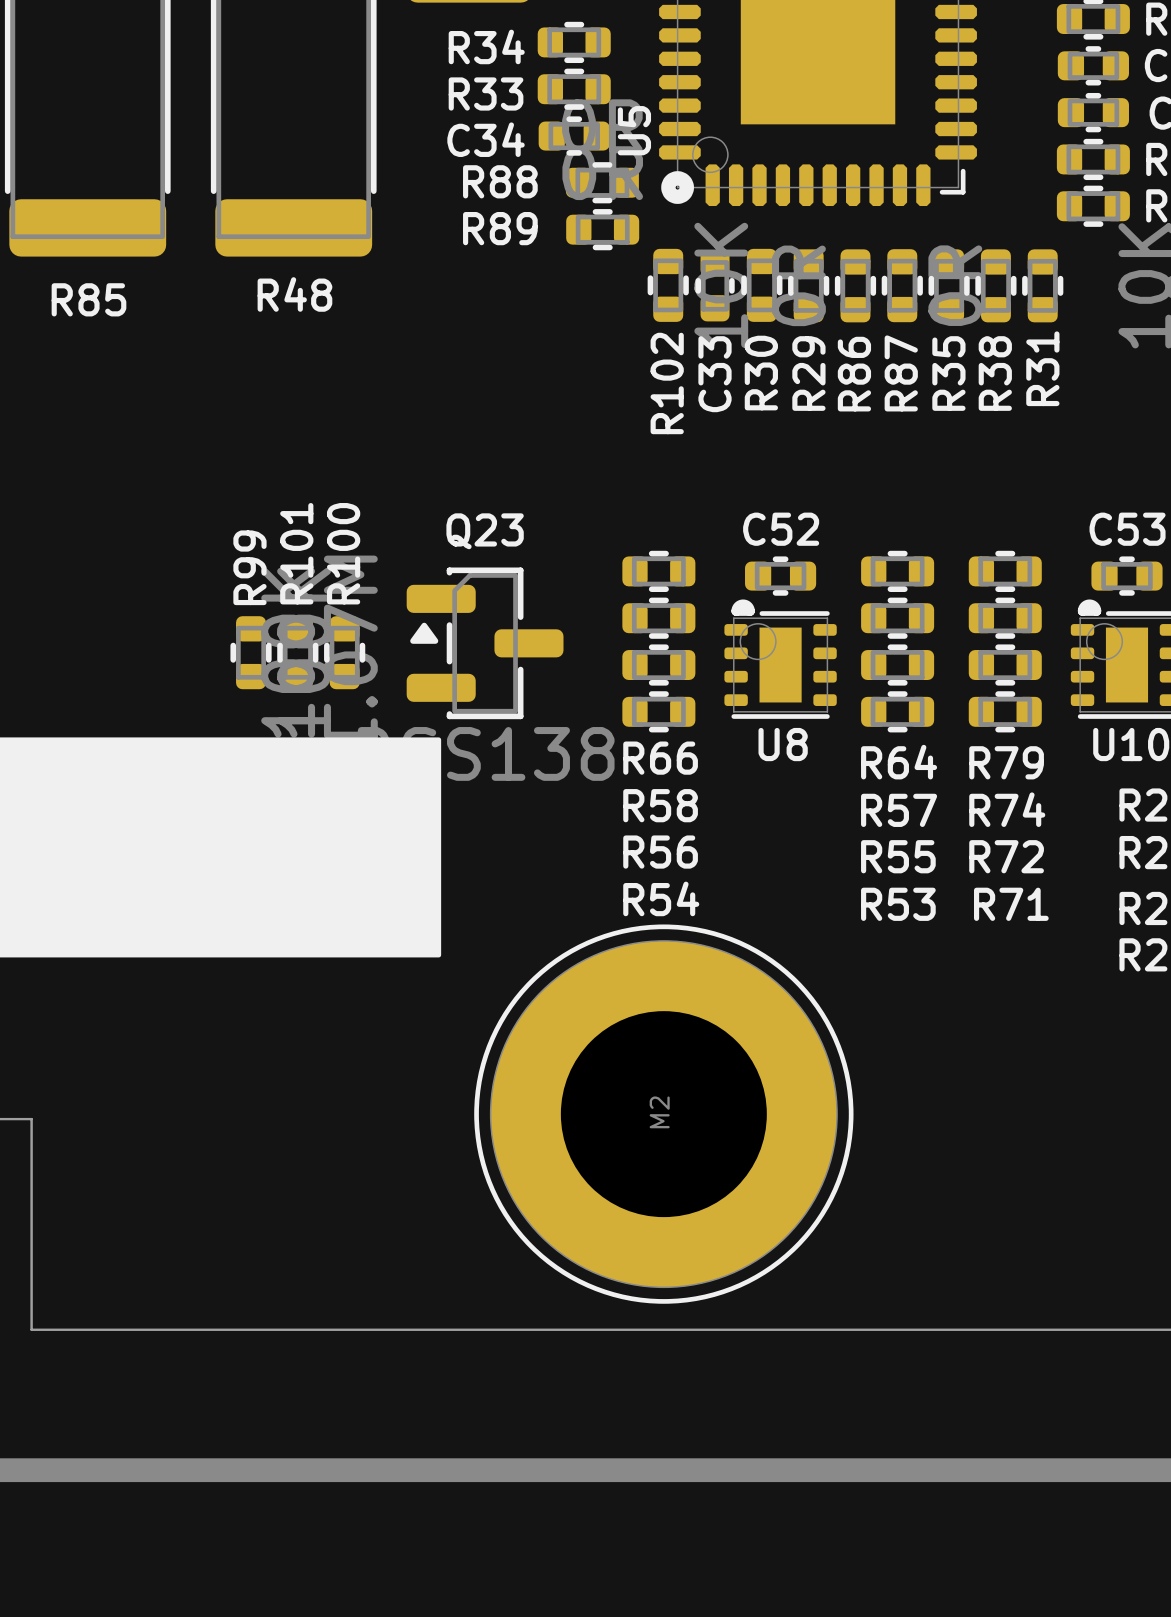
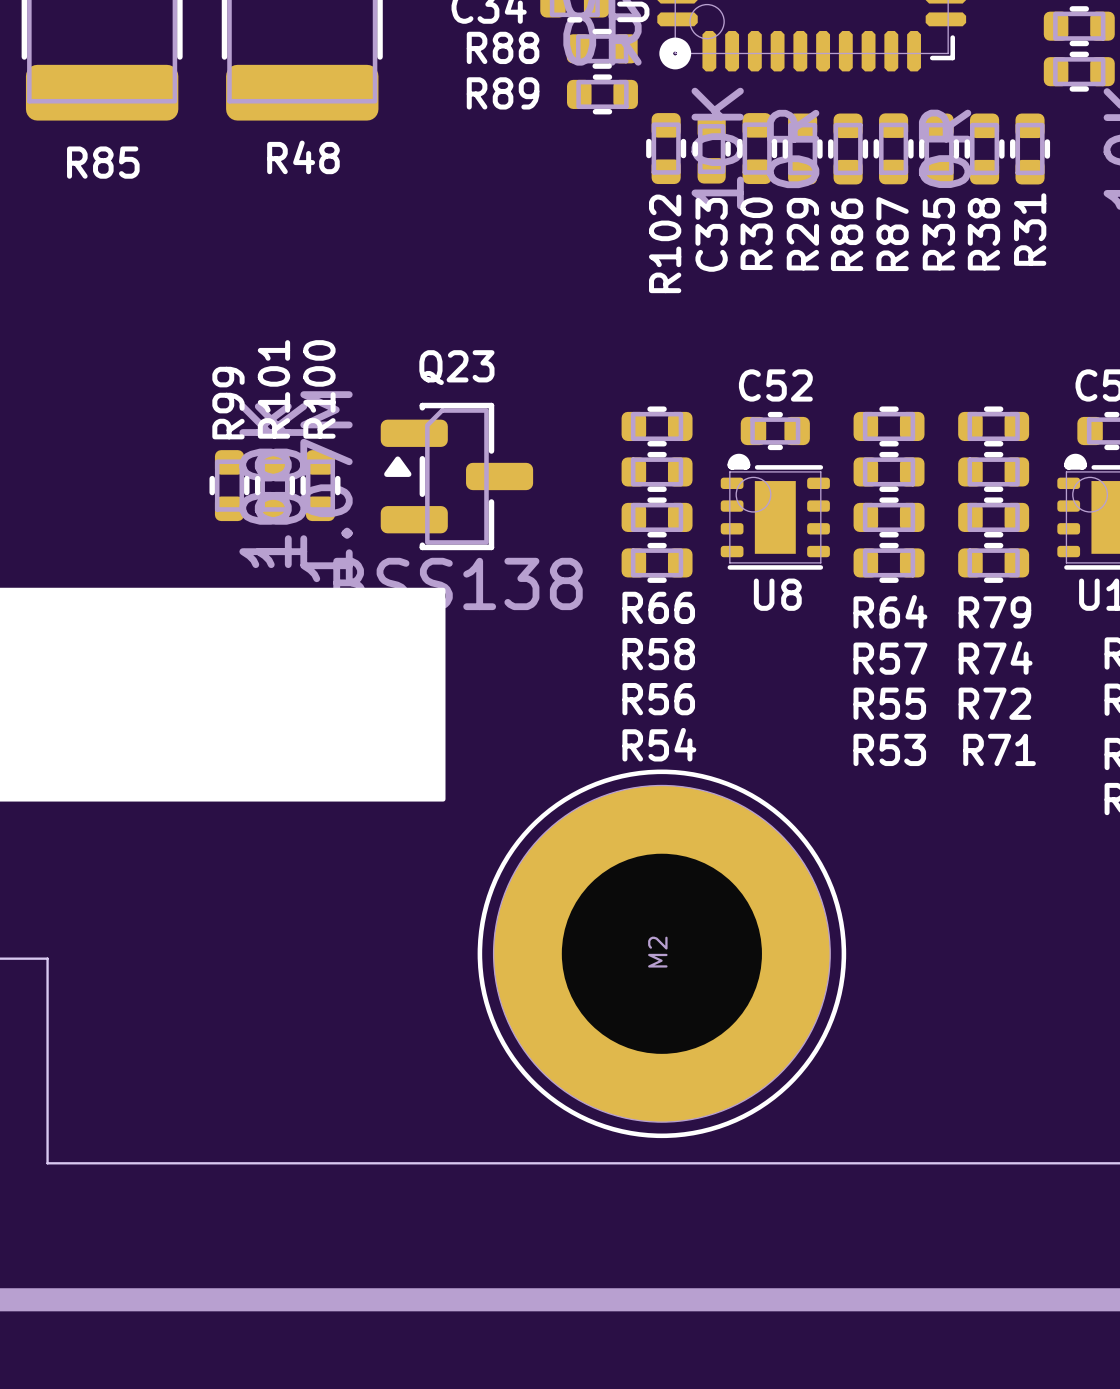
Q23 position: (485, 643) -> (456, 476)
R99 position: (251, 652) -> (229, 485)
R101 position: (297, 652) -> (274, 485)
R100 position: (344, 652) -> (320, 485)

